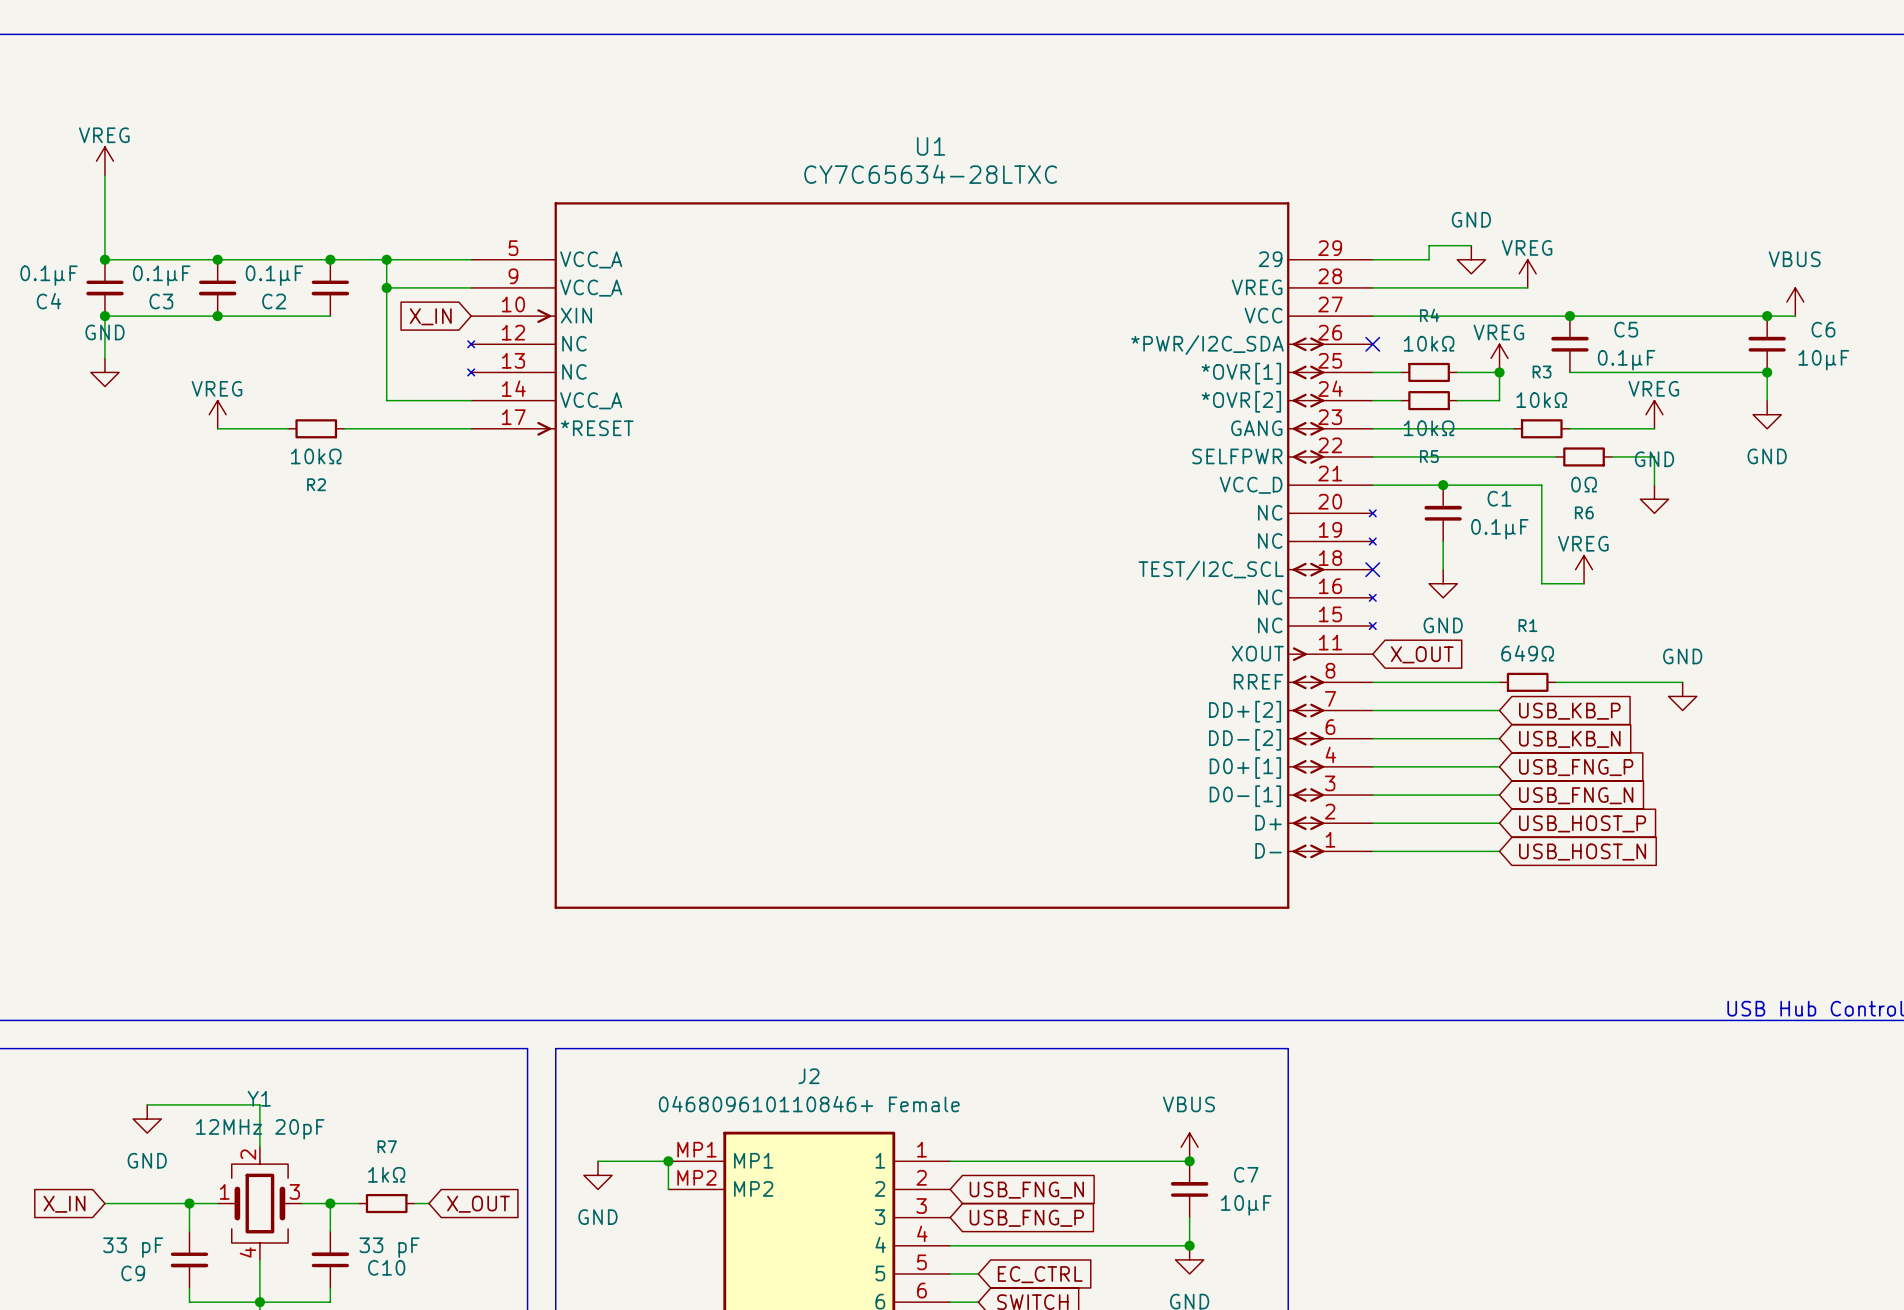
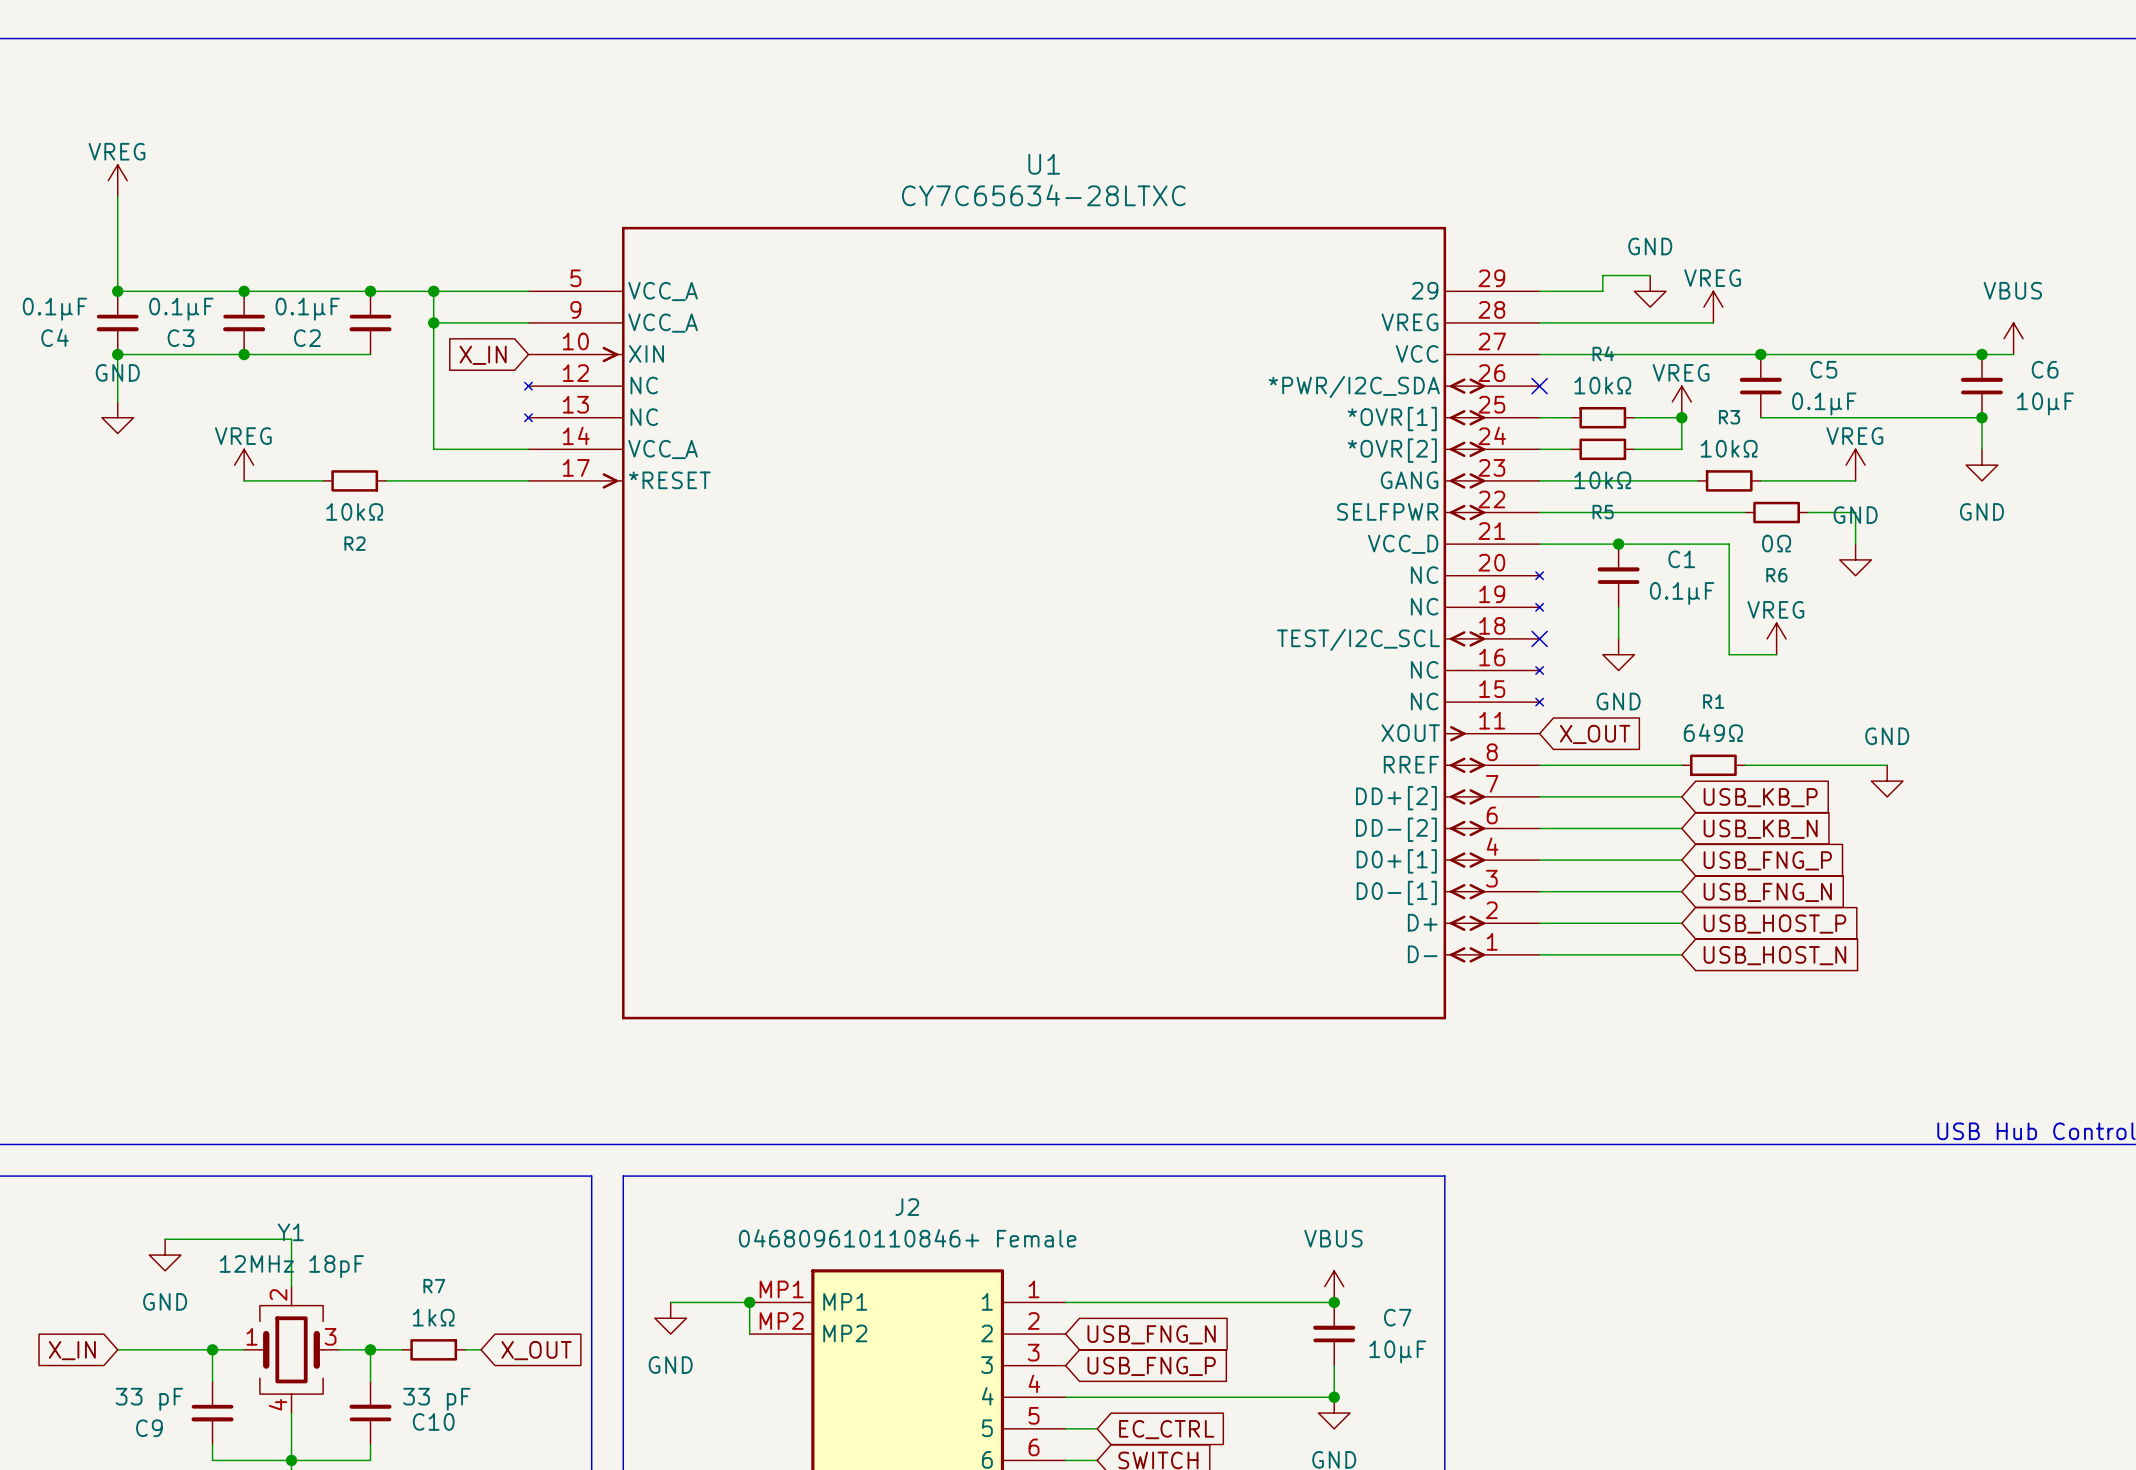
Y1 value: 12MHz 20pF (260, 1129) -> 12MHz 18pF (291, 1266)

